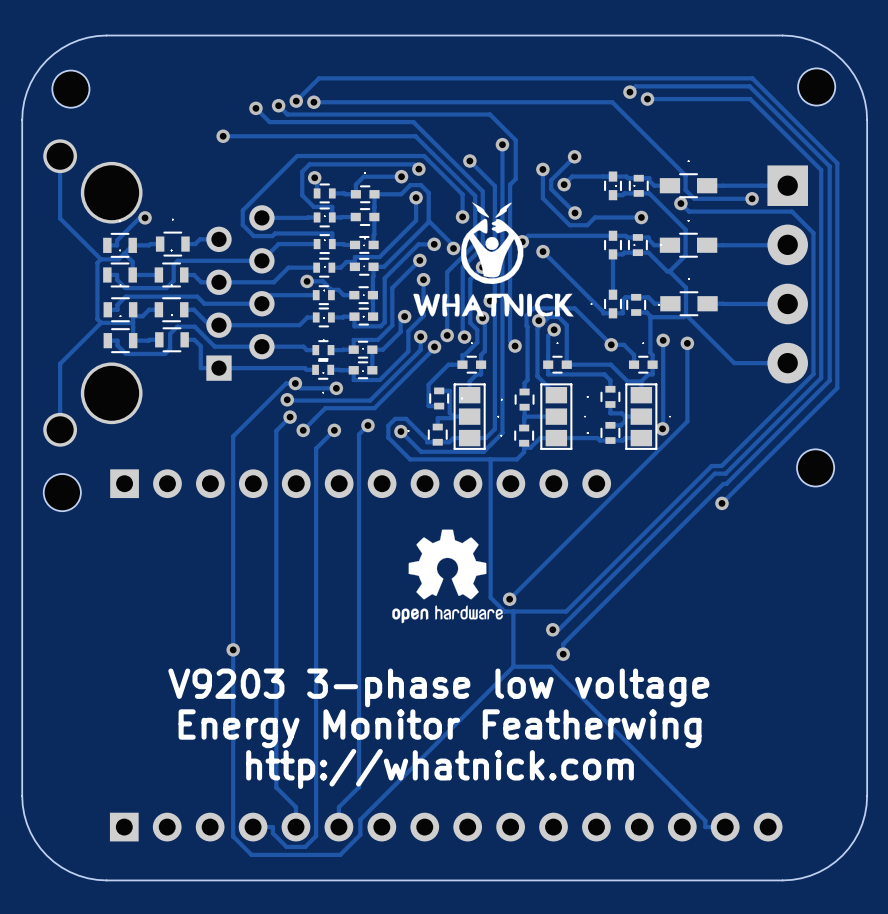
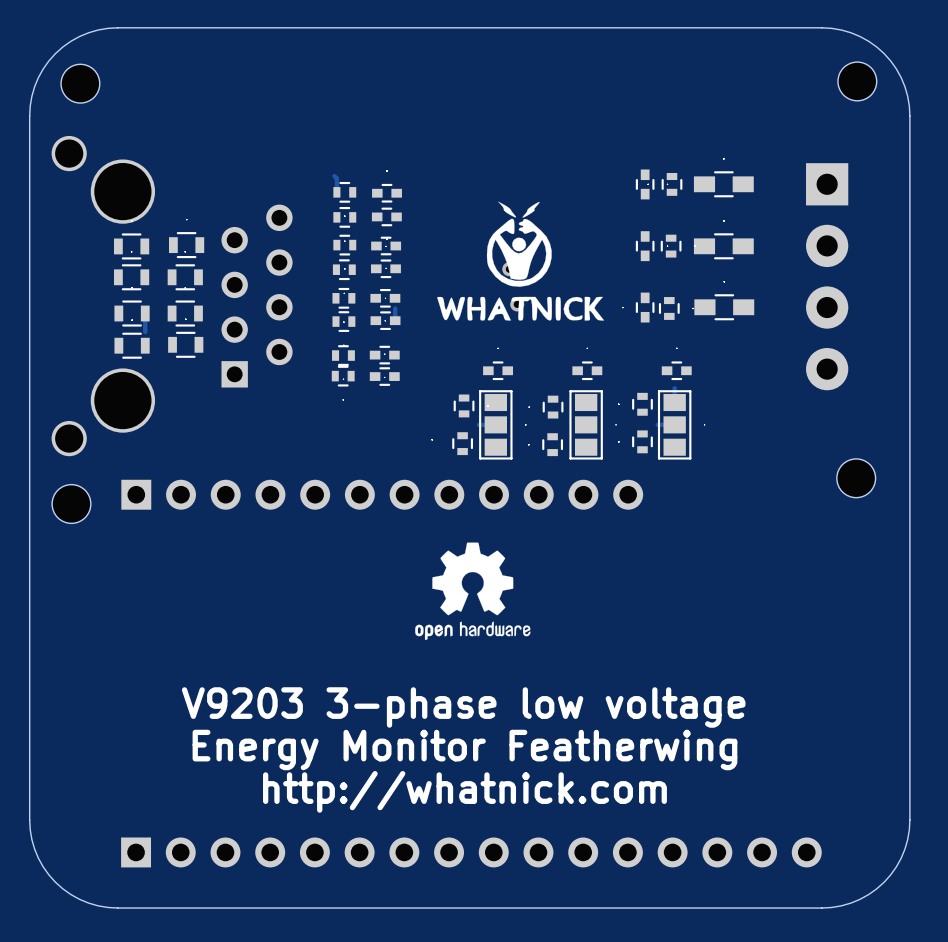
track: (629, 92) (635, 86) (749, 86) (829, 166) (829, 380) (563, 644) (563, 654) -> none
via: (629, 92) -> none
track: (647, 99) (750, 99) (821, 170) (821, 378) (725, 473) (714, 473) (558, 629) (552, 629) -> none
via: (647, 99) -> none
track: (296, 101) (318, 78) (752, 78) (837, 163) (837, 388) (721, 503) -> none
via: (296, 101) -> none
track: (313, 102) (612, 102) (685, 175) (685, 190) (694, 198) (752, 198) -> none
via: (313, 102) -> none
track: (278, 105) (287, 114) (489, 114) (515, 140) (515, 179) (510, 184) (510, 341) (515, 346) -> none
via: (278, 105) -> none
track: (255, 108) (269, 122) (413, 122) (482, 191) (482, 247) (462, 267) (462, 335) (464, 337) -> none
via: (255, 108) -> none
track: (223, 136) (415, 136) (475, 195) (475, 244) (447, 272) (447, 335) -> none
via: (223, 136) -> none
track: (502, 144) (502, 433) (483, 451) (421, 451) (400, 431) -> none
via: (502, 144) -> none
track: (60, 156) (60, 218) (100, 259) -> none
track: (574, 156) (551, 180) (551, 189) (575, 212) -> none
via: (574, 156) -> none
track: (469, 161) (494, 185) (494, 429) (485, 438) (453, 438) (449, 442) (427, 442) (427, 439) (406, 418) (395, 418) (388, 425) (388, 437) (410, 459) (516, 459) (524, 452) (524, 443) -> none
via: (469, 161) -> none
track: (418, 169) (414, 164) (309, 164) (302, 171) (302, 195) (313, 206) (332, 206) (332, 217) (355, 217) -> none
via: (418, 169) -> none
track: (542, 169) (542, 198) (569, 225) (587, 225) (595, 217) (641, 217) -> none
via: (542, 169) -> none
track: (401, 176) (363, 176) (355, 184) (355, 194) (332, 193) -> none
via: (401, 176) -> none
via: (314, 177) -> none
track: (564, 184) (572, 176) (626, 176) (628, 178) (649, 178) (654, 185) (669, 185) -> none
via: (564, 184) -> none
track: (787, 185) (707, 185) -> none
track: (613, 195) (649, 193) (685, 229) (685, 255) (669, 271) -> none
track: (416, 197) (416, 220) (379, 257) (354, 257) (354, 266) -> none
via: (416, 197) -> none
via: (752, 198) -> none
track: (680, 203) (688, 211) (791, 211) (813, 233) (813, 374) (721, 466) (711, 466) (566, 611) (504, 611) (490, 597) (490, 459) -> none
via: (680, 203) -> none
track: (374, 207) (374, 194) (401, 194) (410, 185) (420, 185) (428, 192) (428, 222) -> none
track: (374, 207) (373, 244) -> none
via: (575, 212) -> none
track: (462, 216) (462, 194) (424, 156) (297, 156) (242, 210) (242, 225) (253, 236) (272, 236) (275, 233) (332, 233) (332, 244) (355, 244) -> none
via: (462, 216) -> none
track: (145, 217) (139, 217) (117, 240) (117, 245) (107, 245) -> none
via: (145, 217) -> none
track: (317, 217) (261, 217) -> none
via: (641, 217) -> none
track: (428, 222) (384, 266) (373, 266) (372, 304) -> none
track: (428, 222) (453, 245) (453, 248) -> none
track: (218, 239) (199, 239) (195, 244) (185, 244) -> none
track: (522, 241) (528, 235) (625, 235) (627, 237) (648, 237) (654, 245) (669, 245) -> none
via: (522, 241) -> none
track: (160, 244) (132, 245) (124, 253) -> none
track: (317, 244) (278, 244) (261, 260) (177, 260) (173, 264) (173, 280) (166, 288) (125, 288) (117, 279) (117, 274) (107, 274) -> none
track: (434, 244) (418, 244) (384, 278) (384, 322) (380, 326) (354, 326) (354, 316) (331, 317) -> none
via: (434, 244) -> none
track: (787, 244) (707, 245) -> none
via: (453, 248) -> none
track: (543, 251) (603, 313) (622, 313) (622, 300) (625, 297) (648, 297) (654, 303) (670, 303) -> none
via: (543, 251) -> none
track: (124, 253) (132, 261) (132, 274) (158, 274) -> none
track: (124, 253) (118, 259) (100, 259) -> none
track: (100, 259) (97, 262) (97, 319) (101, 322) -> none
track: (419, 260) (392, 287) (392, 325) (377, 339) (353, 339) (353, 349) (331, 350) -> none
via: (419, 260) -> none
track: (354, 261) (346, 261) (340, 267) (331, 267) -> none
track: (316, 267) (288, 267) (273, 282) (201, 282) (193, 274) (184, 274) -> none
track: (482, 267) (470, 279) (470, 322) (477, 329) (477, 342) (462, 354) (462, 364) (448, 364) (428, 384) (428, 406) (439, 406) -> none
track: (669, 271) (667, 271) (648, 252) (613, 254) (613, 294) -> none
track: (669, 271) (686, 287) (686, 314) -> none
track: (423, 279) (423, 315) (408, 331) (408, 351) (379, 379) (353, 379) (353, 370) (330, 369) -> none
via: (423, 279) -> none
track: (307, 281) (322, 281) (331, 289) -> none
via: (307, 281) -> none
track: (331, 289) (338, 289) (343, 295) (354, 295) -> none
track: (316, 295) (270, 295) (261, 303) (204, 303) (197, 296) (125, 296) (117, 304) (117, 309) (107, 309) -> none
track: (707, 303) (787, 303) -> none
track: (158, 309) (149, 309) (142, 316) (133, 316) -> none
track: (184, 309) (193, 309) (209, 325) (299, 325) (307, 317) (316, 317) -> none
track: (636, 312) (646, 312) (650, 316) (652, 374) (648, 374) (641, 381) (627, 381) (610, 364) (566, 364) (566, 325) (558, 316) (548, 316) (537, 328) (537, 376) (556, 395) -> none
track: (686, 314) (734, 363) (787, 363) -> none
track: (686, 314) (683, 317) (650, 317) -> none
track: (404, 316) (400, 320) (400, 331) (382, 349) (372, 349) (372, 370) -> none
via: (404, 316) -> none
track: (482, 317) (484, 320) (484, 351) (481, 354) (481, 374) (476, 374) (469, 381) (469, 395) -> none
via: (482, 317) -> none
via: (538, 320) -> none
track: (101, 322) (60, 363) (60, 429) -> none
track: (133, 322) (101, 322) -> none
track: (133, 327) (133, 340) (159, 339) -> none
track: (554, 329) (548, 335) (548, 374) (604, 374) (610, 380) (610, 389) -> none
via: (554, 329) -> none
via: (447, 335) -> none
track: (420, 336) (420, 349) (370, 400) (287, 399) -> none
via: (420, 336) -> none
via: (464, 337) -> none
track: (184, 339) (194, 339) (200, 346) (200, 368) (304, 368) (315, 369) -> none
track: (107, 340) (117, 340) (117, 345) (125, 353) (165, 353) (170, 348) (170, 333) (177, 326) (194, 326) (214, 346) (303, 346) (306, 350) (315, 350) -> none
track: (663, 340) (662, 428) -> none
via: (663, 340) -> none
track: (687, 343) (687, 421) (509, 599) -> none
via: (687, 343) -> none
via: (611, 344) -> none
track: (434, 346) (374, 408) (325, 408) (303, 430) -> none
via: (434, 346) -> none
via: (515, 346) -> none
track: (634, 364) (634, 354) (623, 344) (611, 344) (574, 308) (533, 308) (526, 315) (527, 380) (524, 383) (524, 391) -> none
via: (295, 383) -> none
track: (336, 388) (300, 388) (295, 383) (286, 383) (233, 436) (233, 836) (251, 854) (340, 854) (360, 834) (360, 819) (513, 666) -> none
via: (336, 388) -> none
track: (439, 390) (449, 390) (449, 412) (453, 416) (437, 418) (437, 427) -> none
via: (287, 399) -> none
track: (610, 404) (610, 413) (621, 413) (625, 416) (625, 421) (620, 425) (610, 425) -> none
track: (524, 407) (524, 428) -> none
track: (556, 416) (524, 416) -> none
track: (290, 417) (276, 430) (276, 787) (295, 807) (295, 827) -> none
via: (290, 417) -> none
track: (367, 425) (359, 434) (359, 787) (338, 807) (338, 827) -> none
via: (367, 425) -> none
via: (662, 428) -> none
via: (303, 430) -> none
track: (334, 430) (316, 448) (316, 836) (305, 846) (286, 846) (272, 833) (272, 827) (253, 827) -> none
via: (334, 430) -> none
via: (400, 431) -> none
track: (641, 438) (625, 438) (622, 440) (599, 440) (597, 438) (540, 438) (530, 447) (524, 447) -> none
via: (721, 503) -> none
via: (509, 599) -> none
track: (513, 611) (513, 666) -> none
via: (552, 629) -> none
via: (233, 649) -> none
via: (563, 654) -> none
track: (513, 666) (551, 666) (705, 820) (705, 827) (725, 827) -> none

